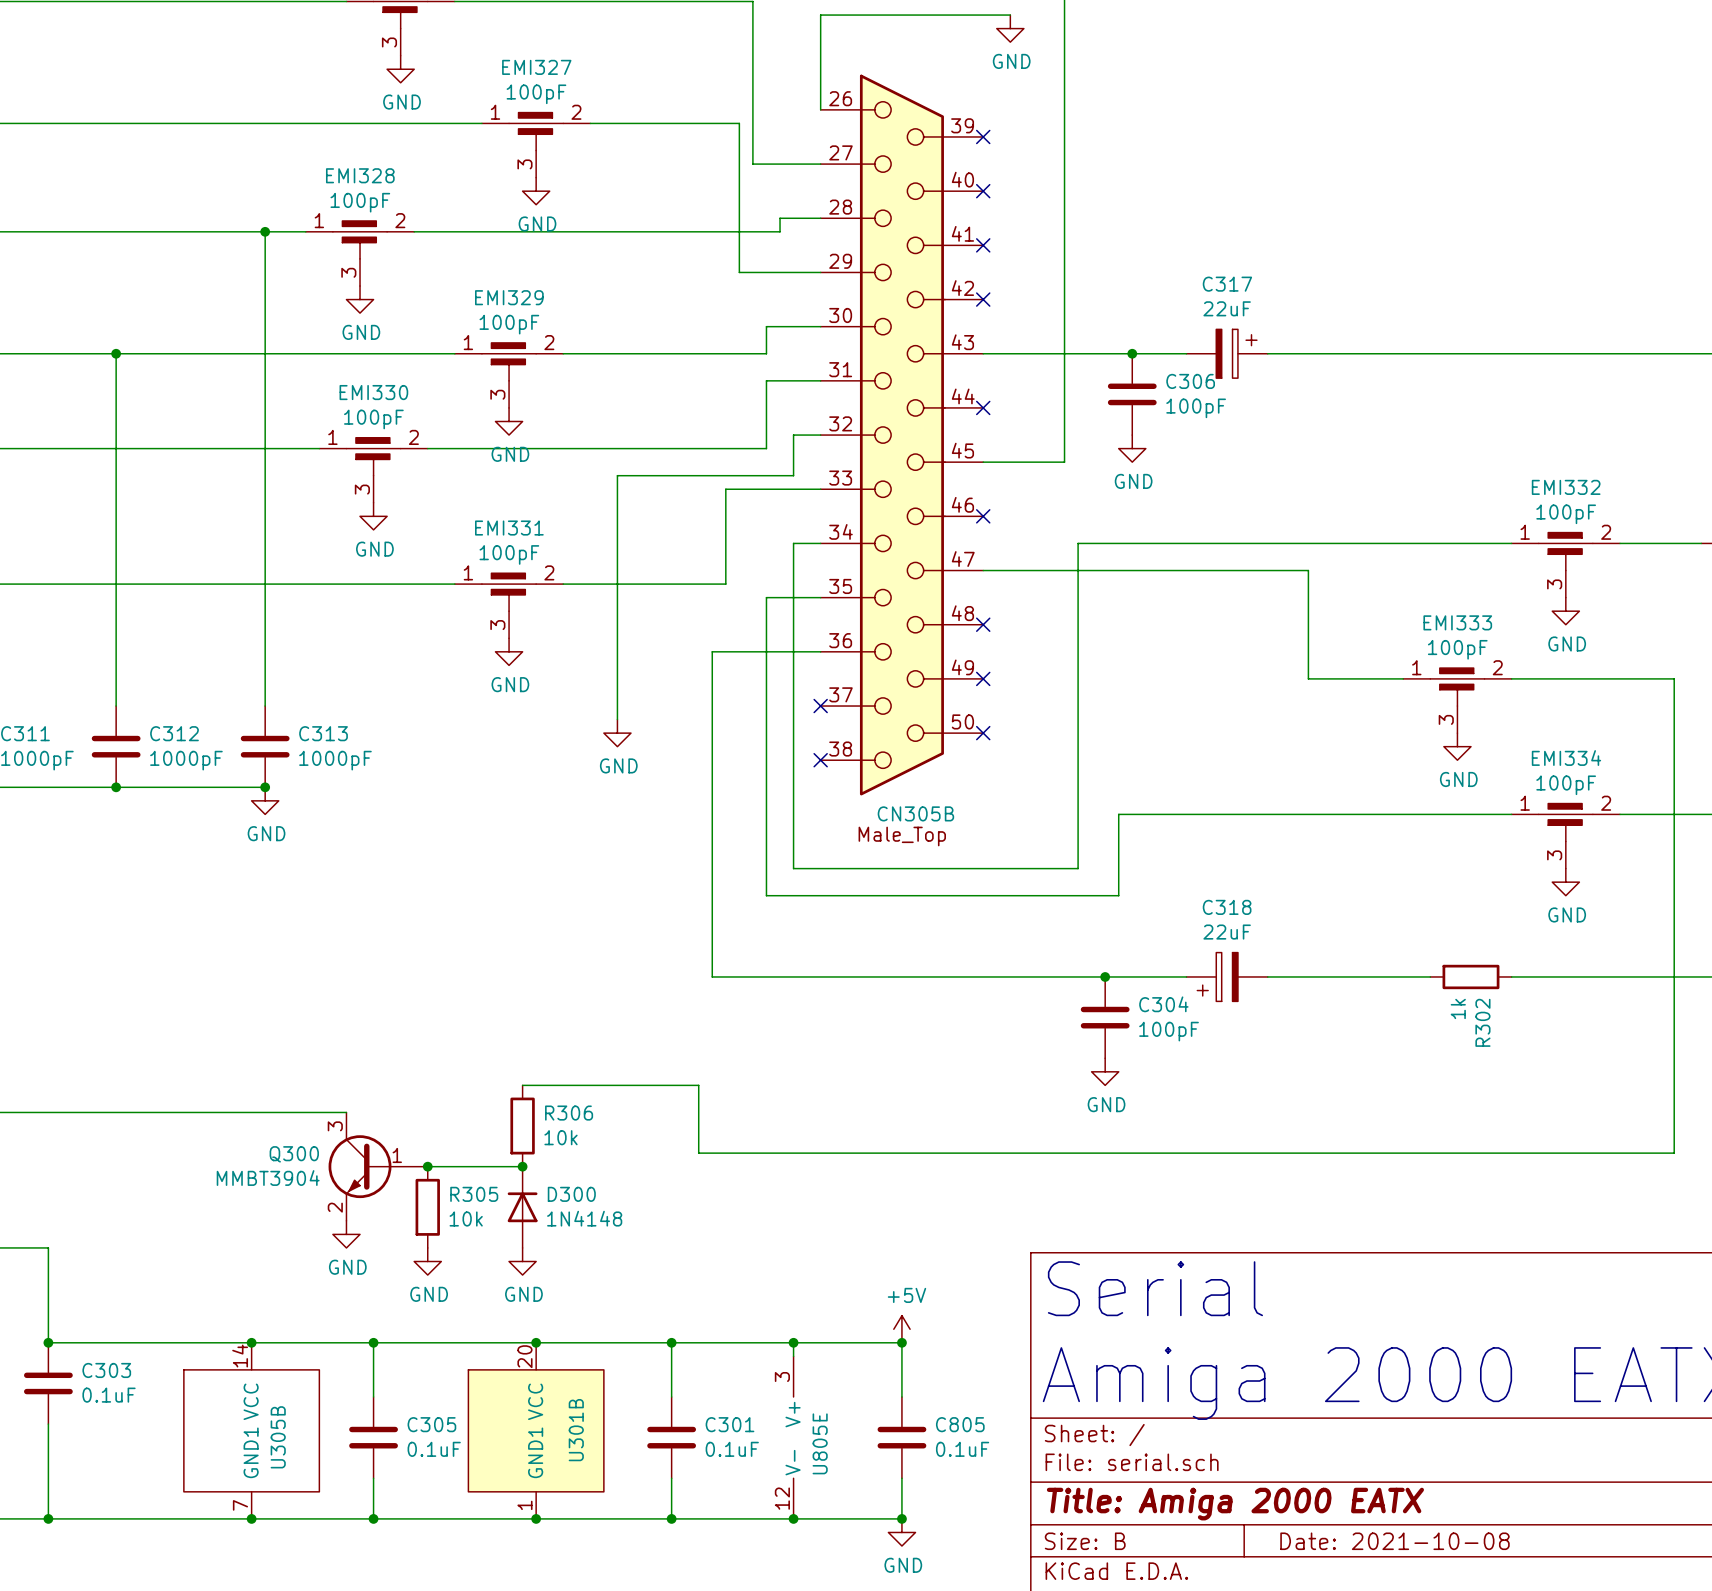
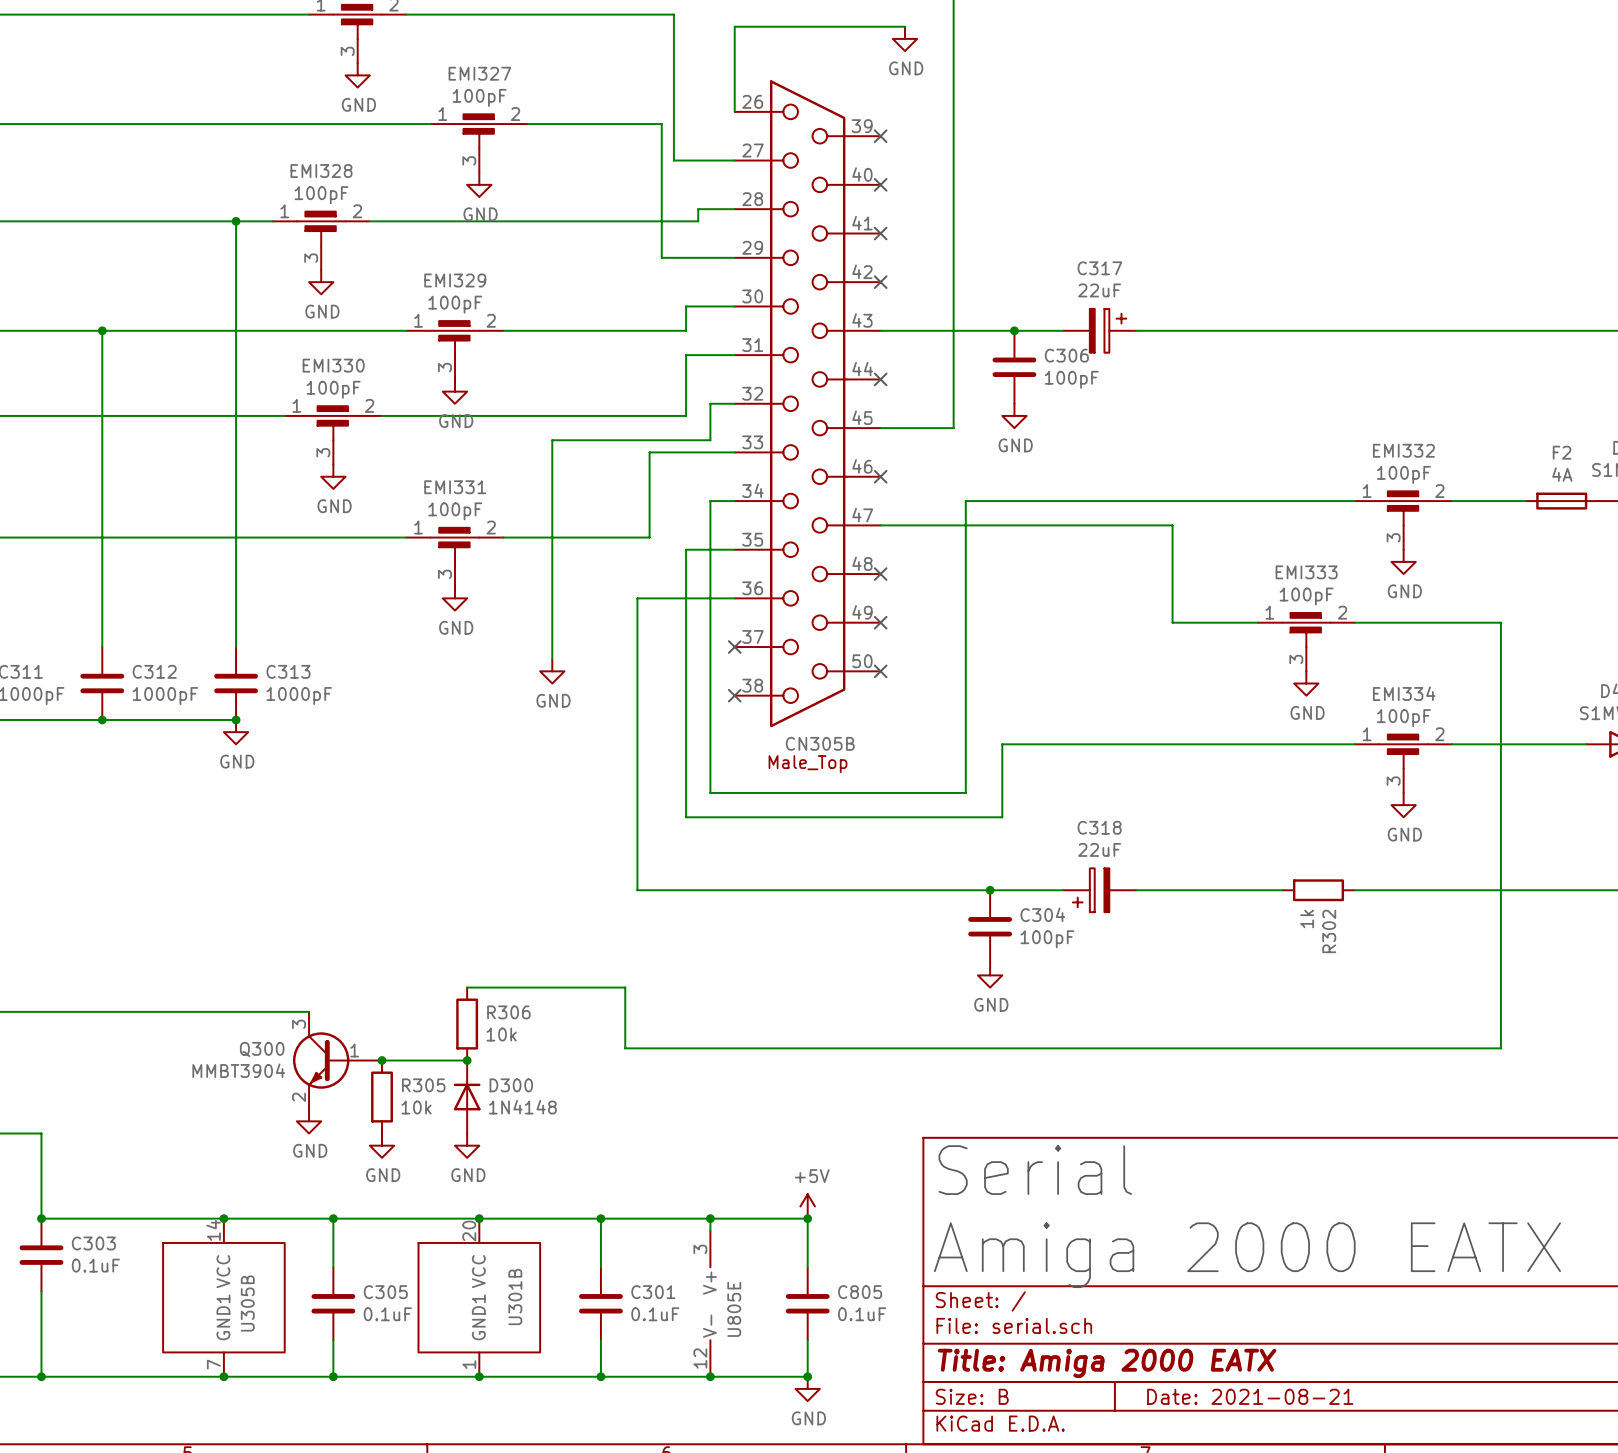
title block: Date: 2021-10-08 (1394, 1541) -> Date: 2021-08-21 (1250, 1396)

